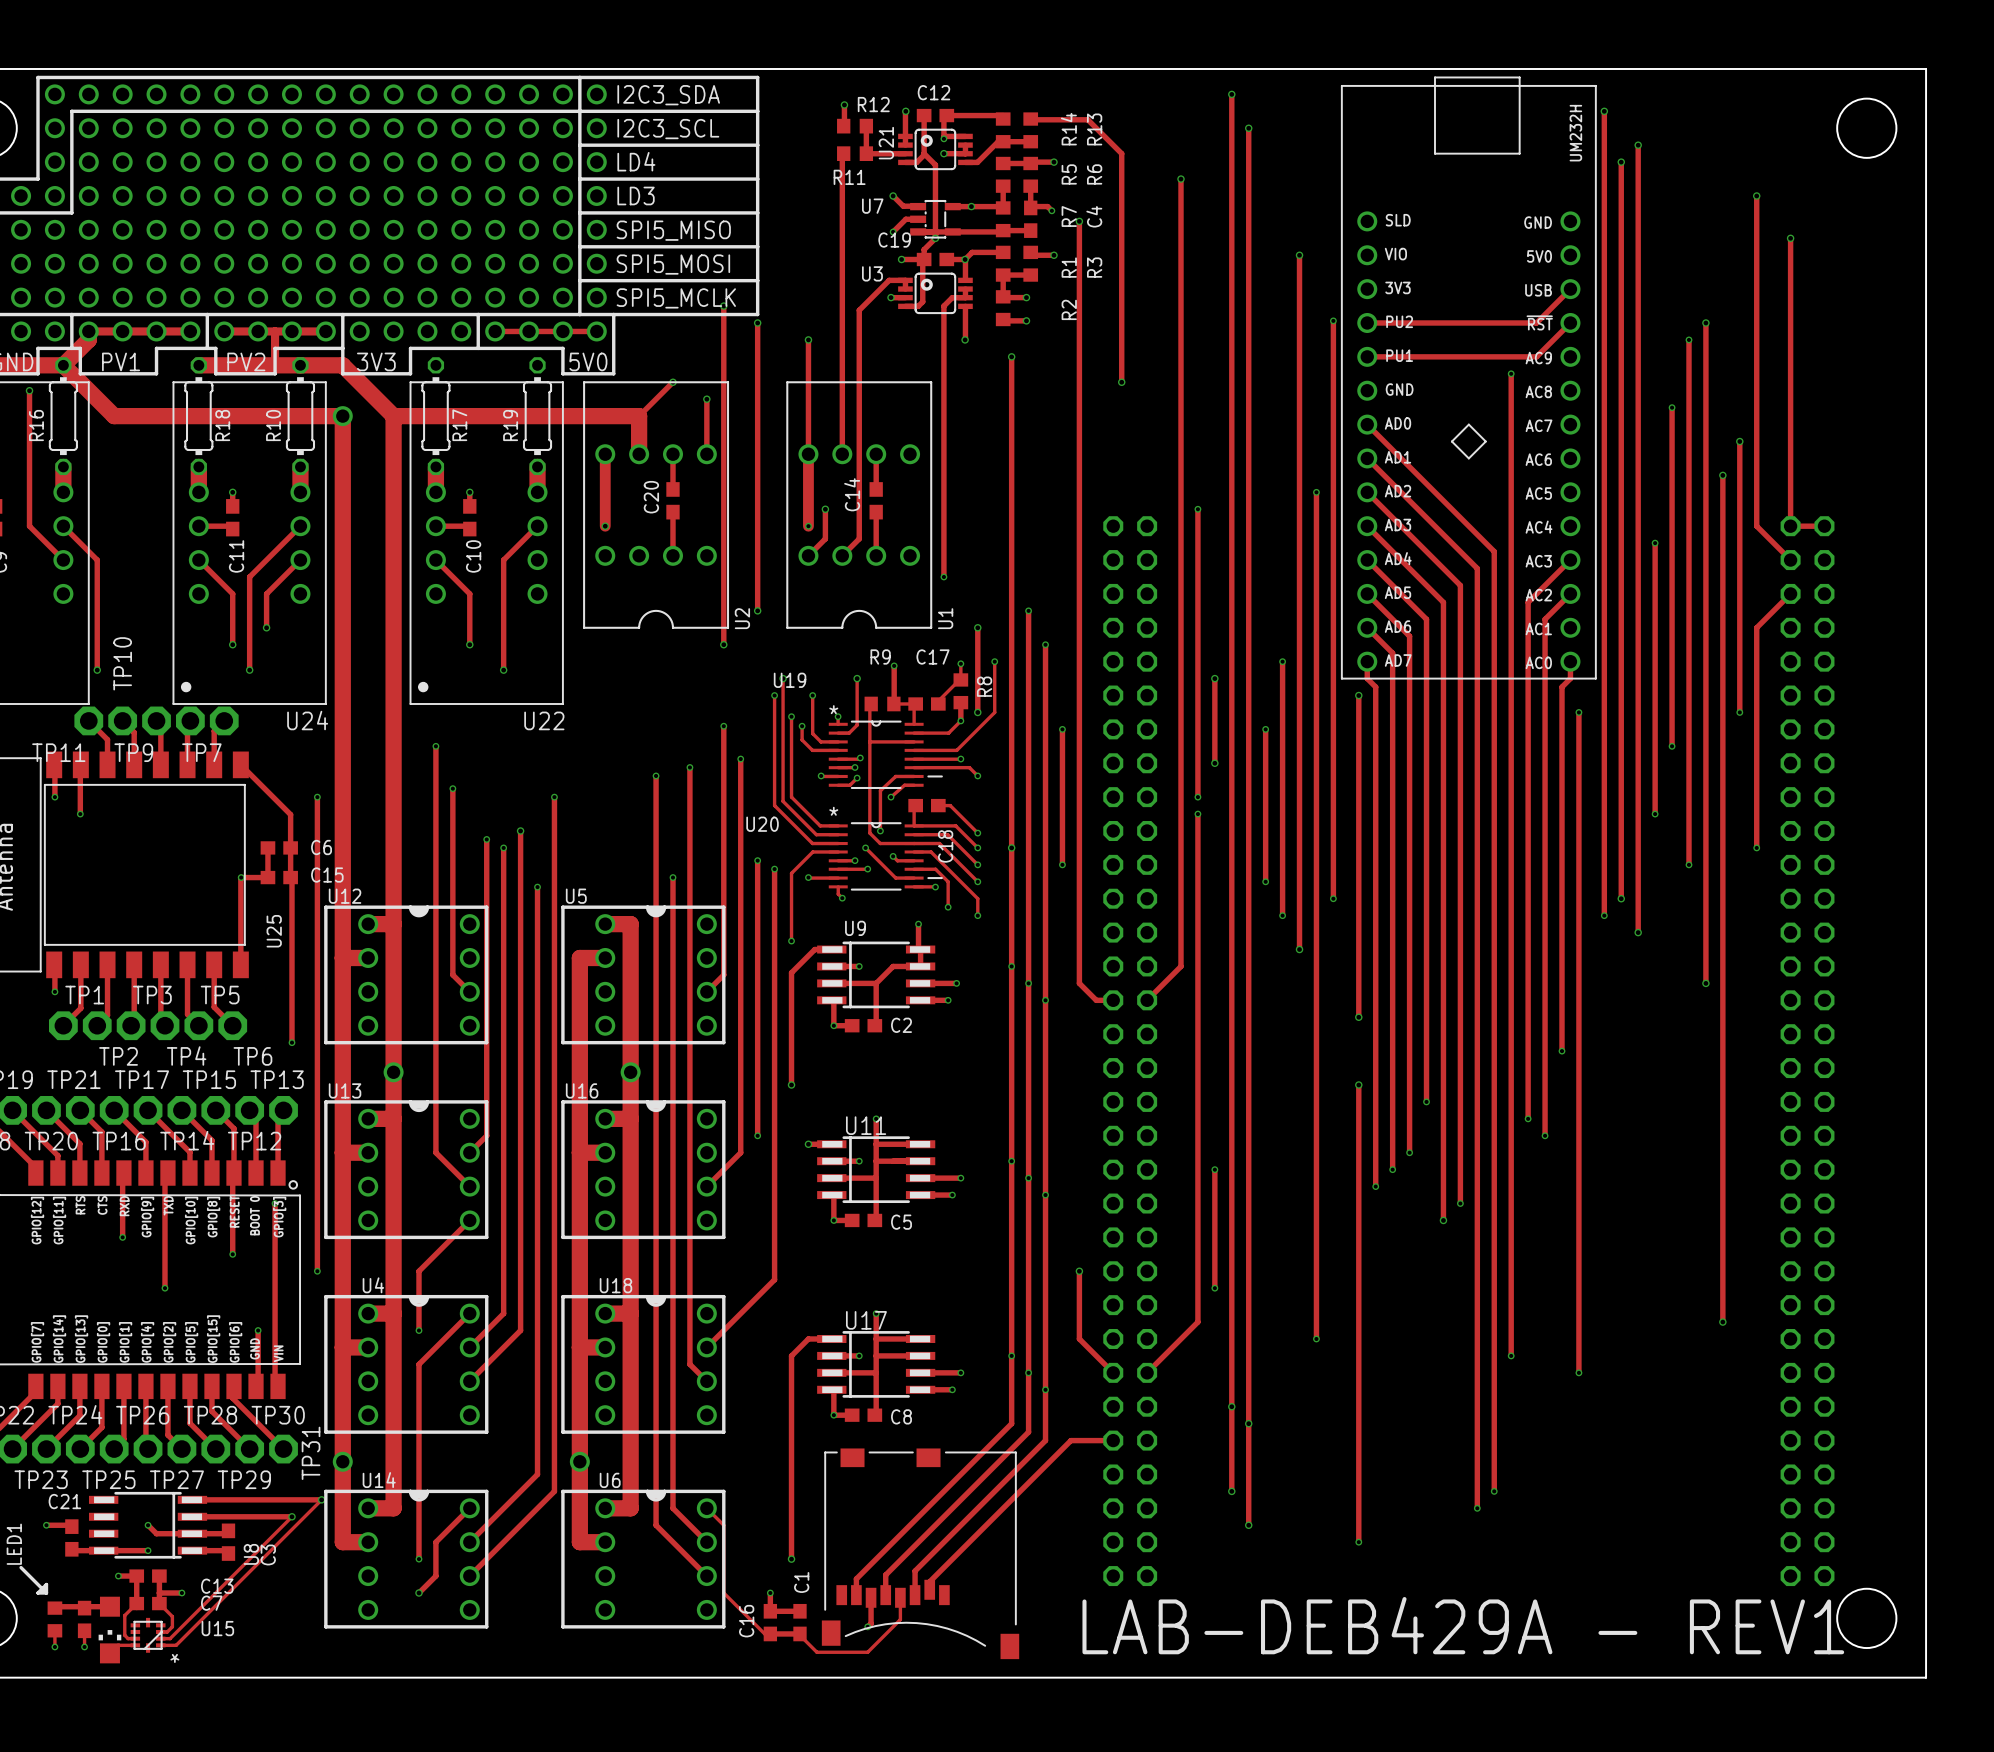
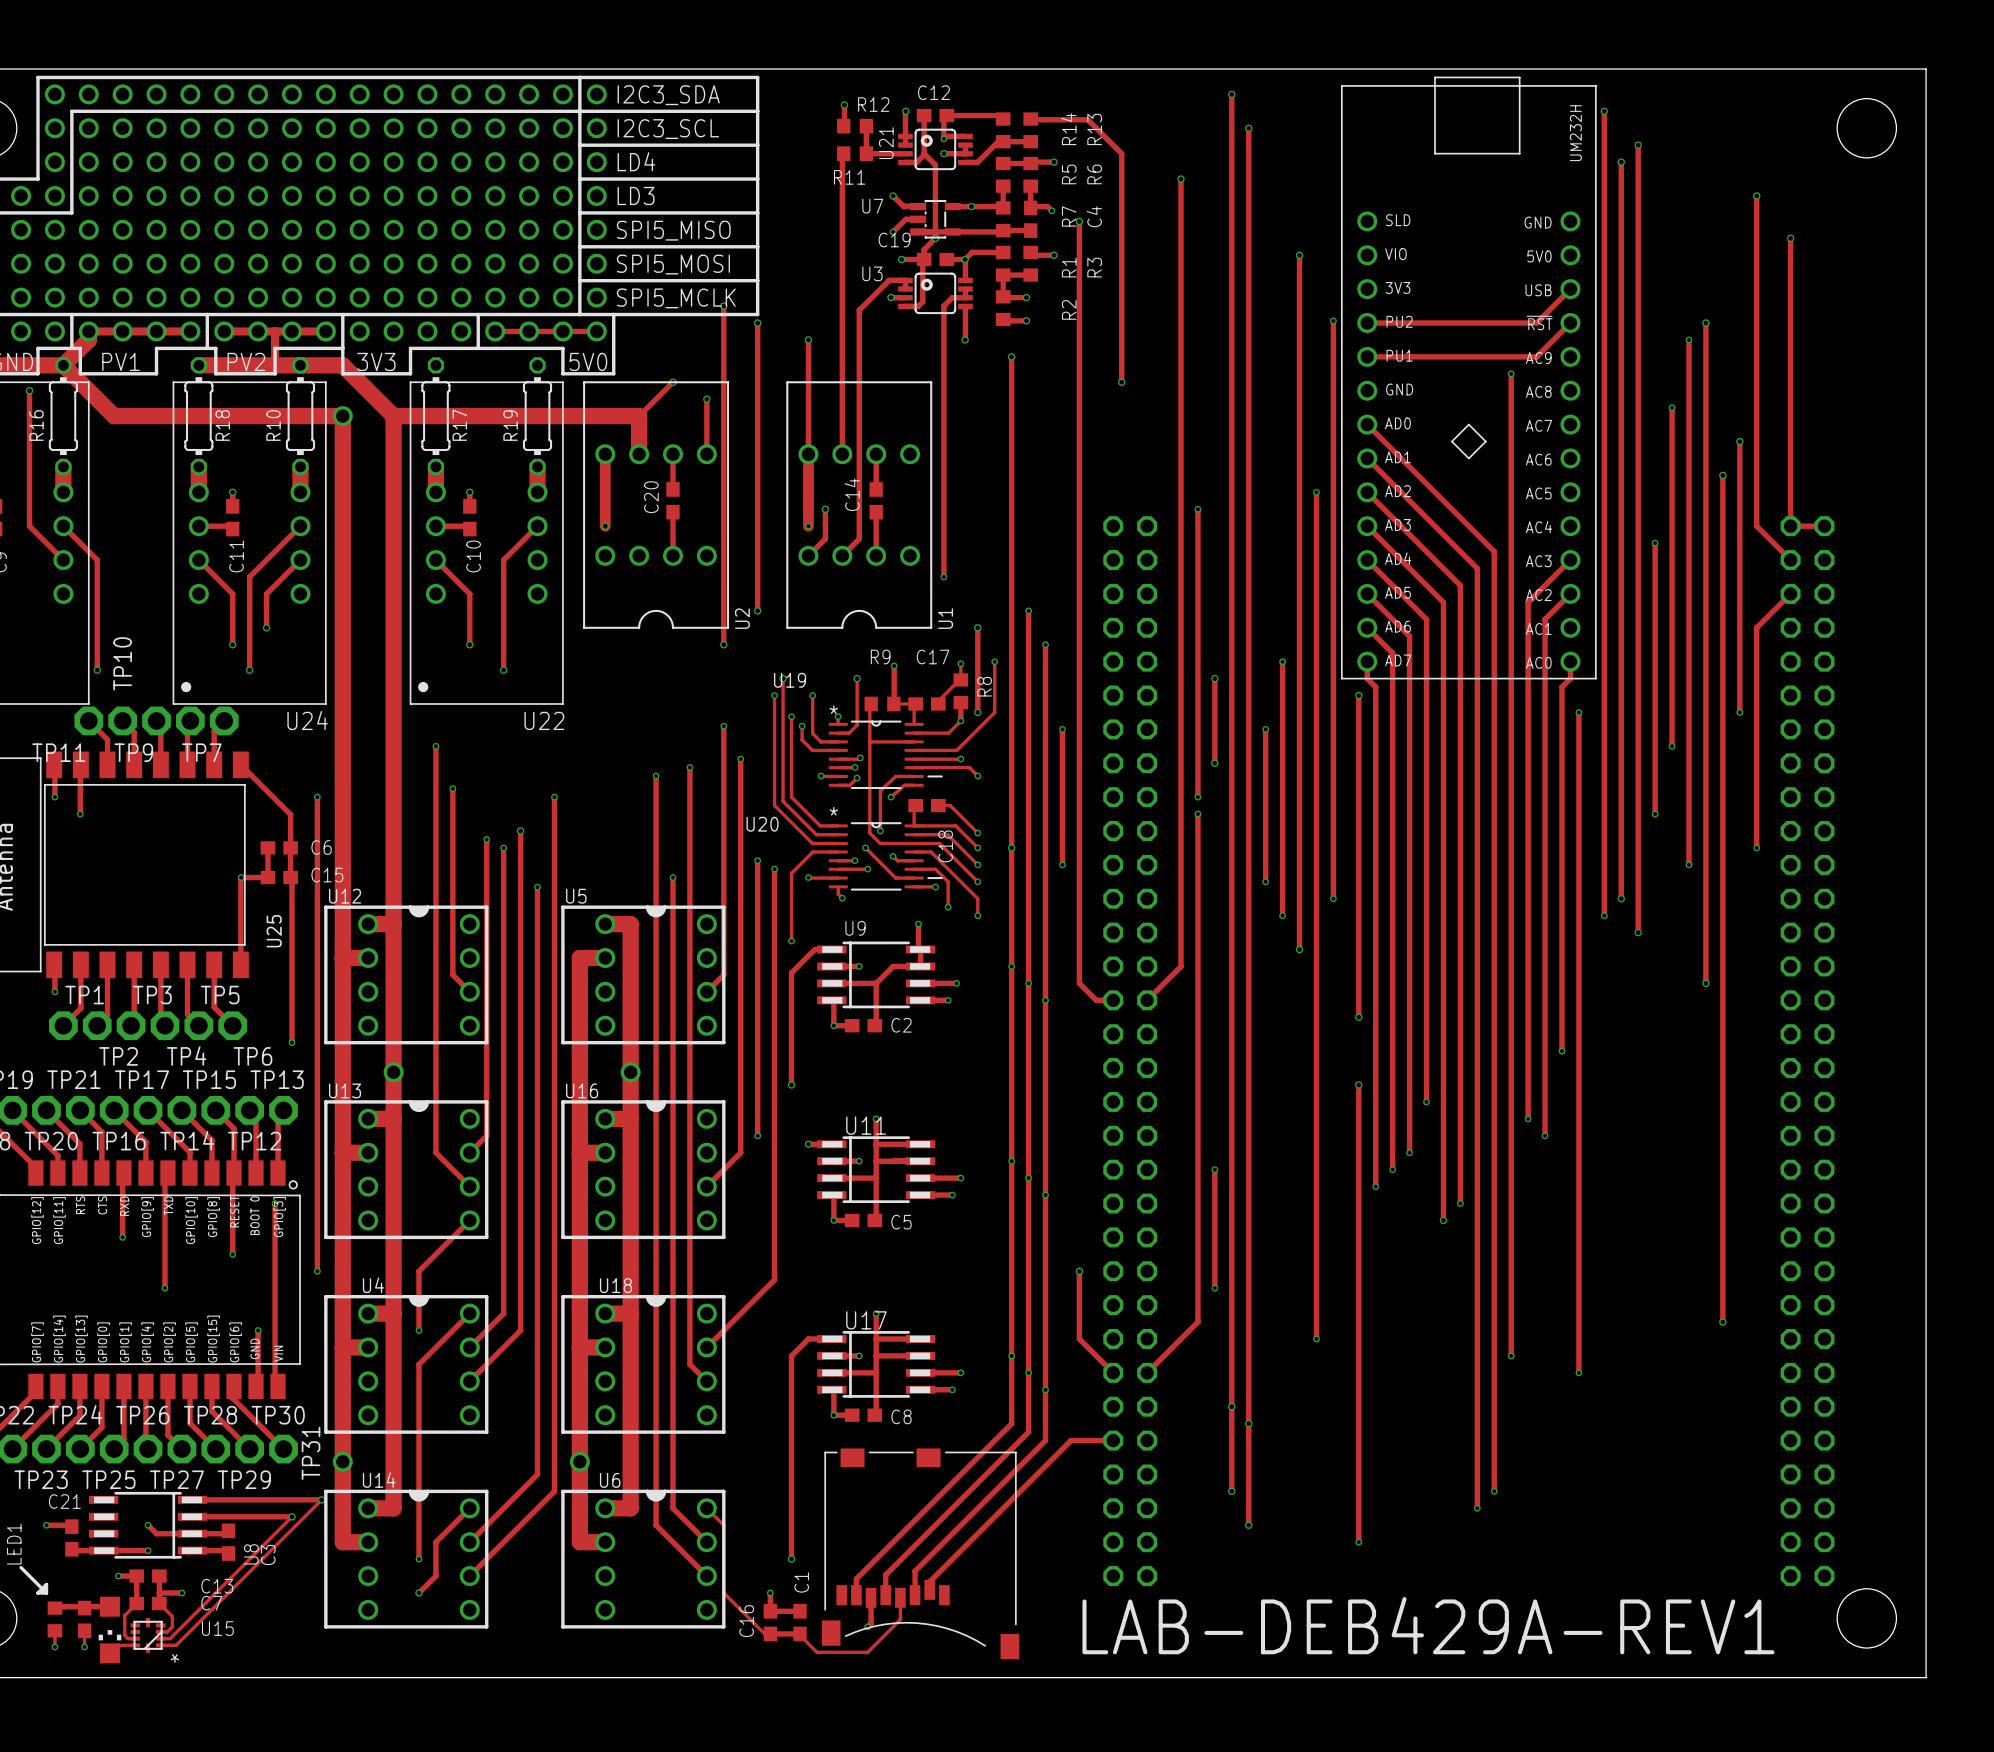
text: LAB-DEB429A - REV1 (1463, 1625) -> LAB-DEB429A-REV1 (1428, 1625)

